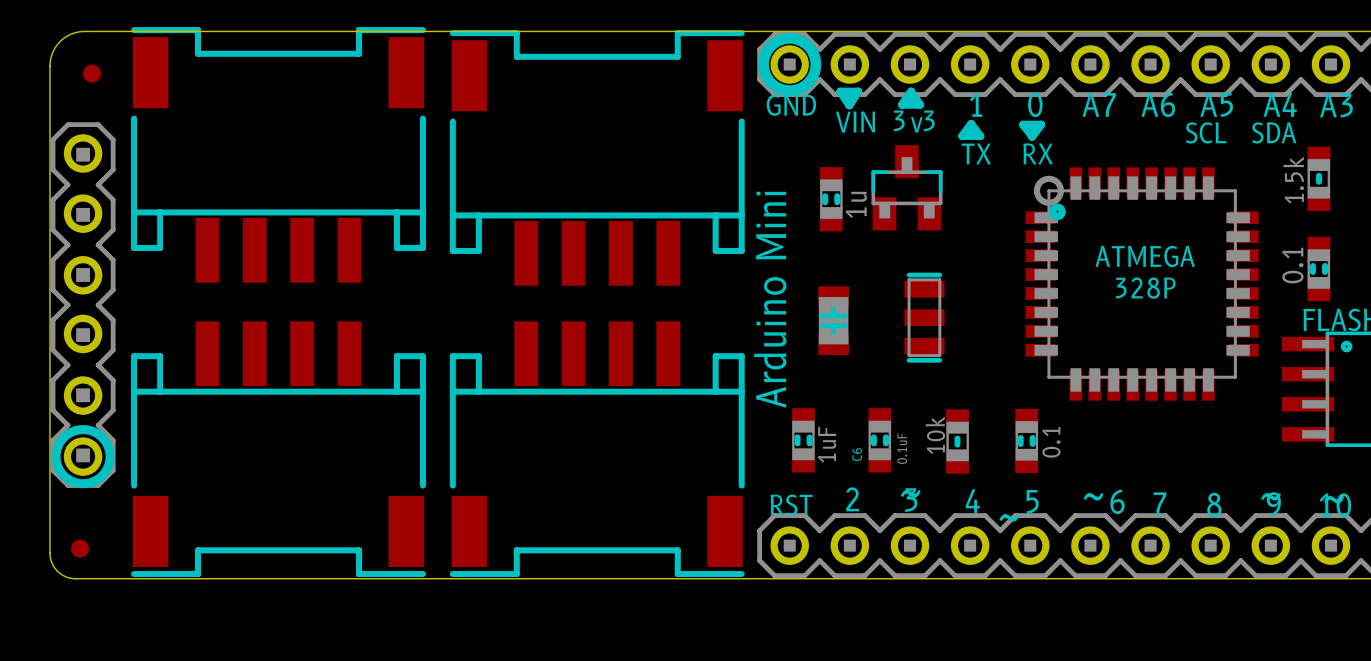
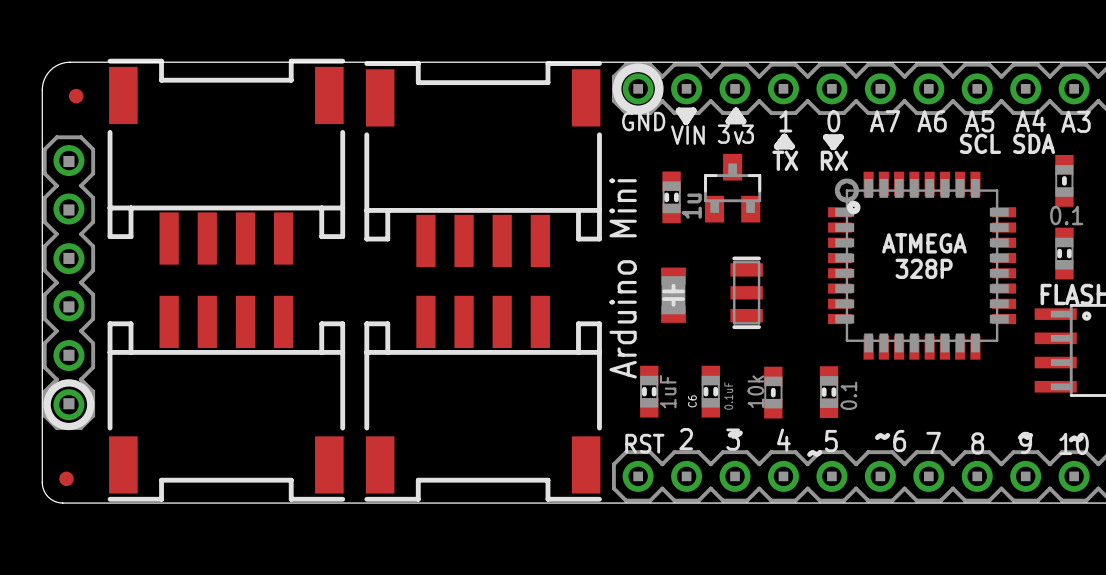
part value: 1.5k (1293, 180) -> none
part value rotation: 0° (1292, 265) -> 90° clockwise (1066, 215)

